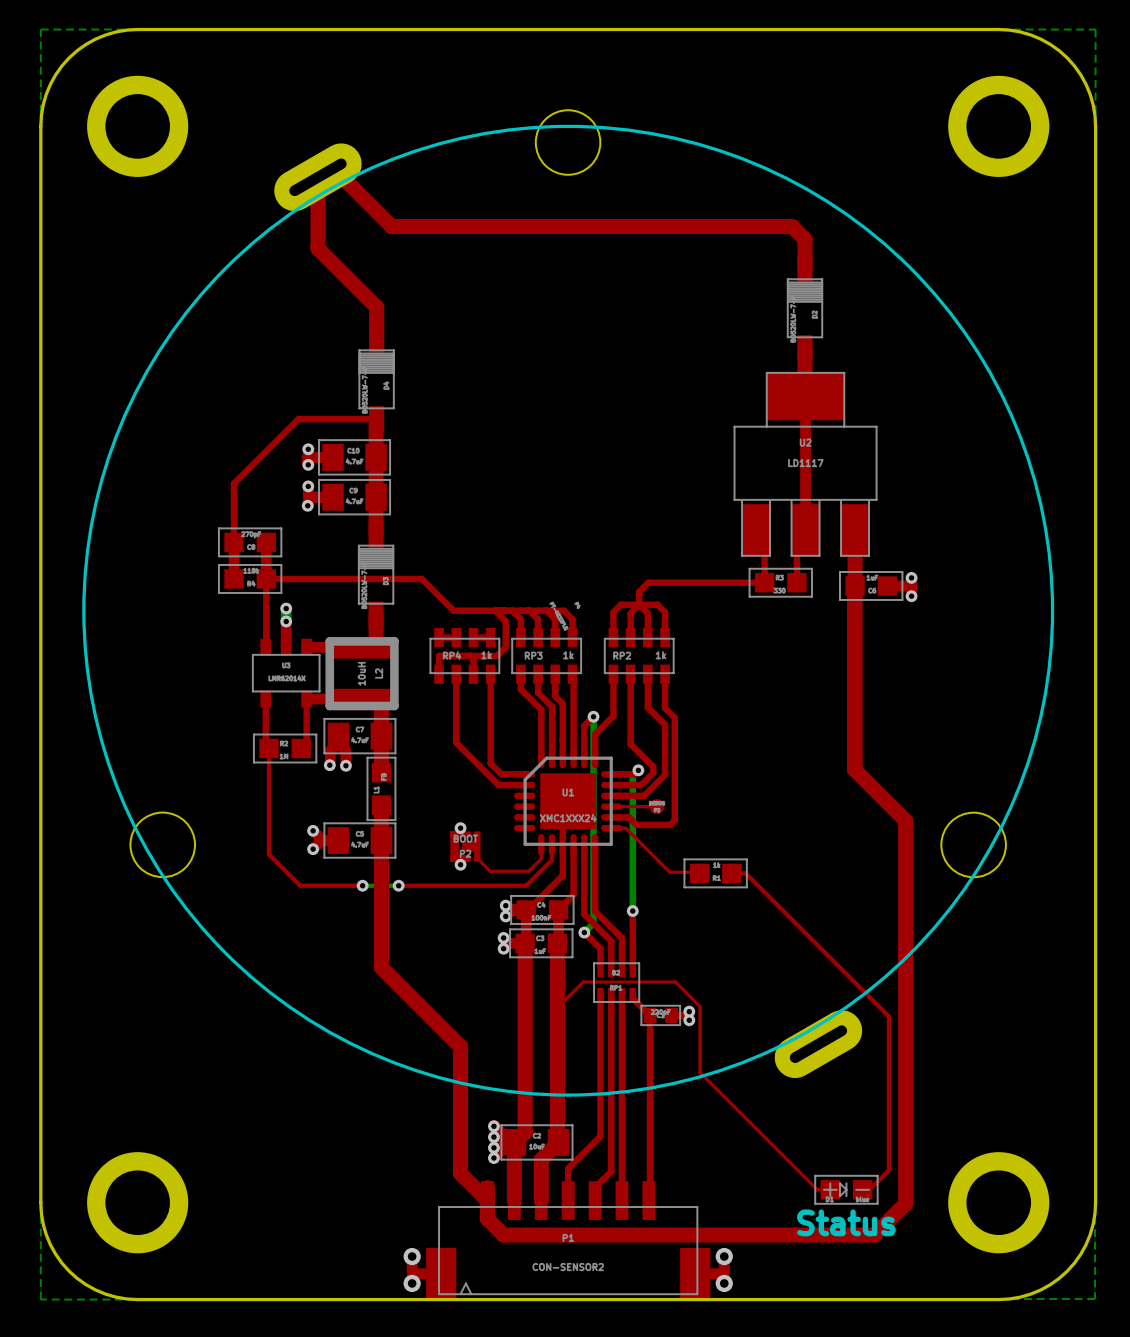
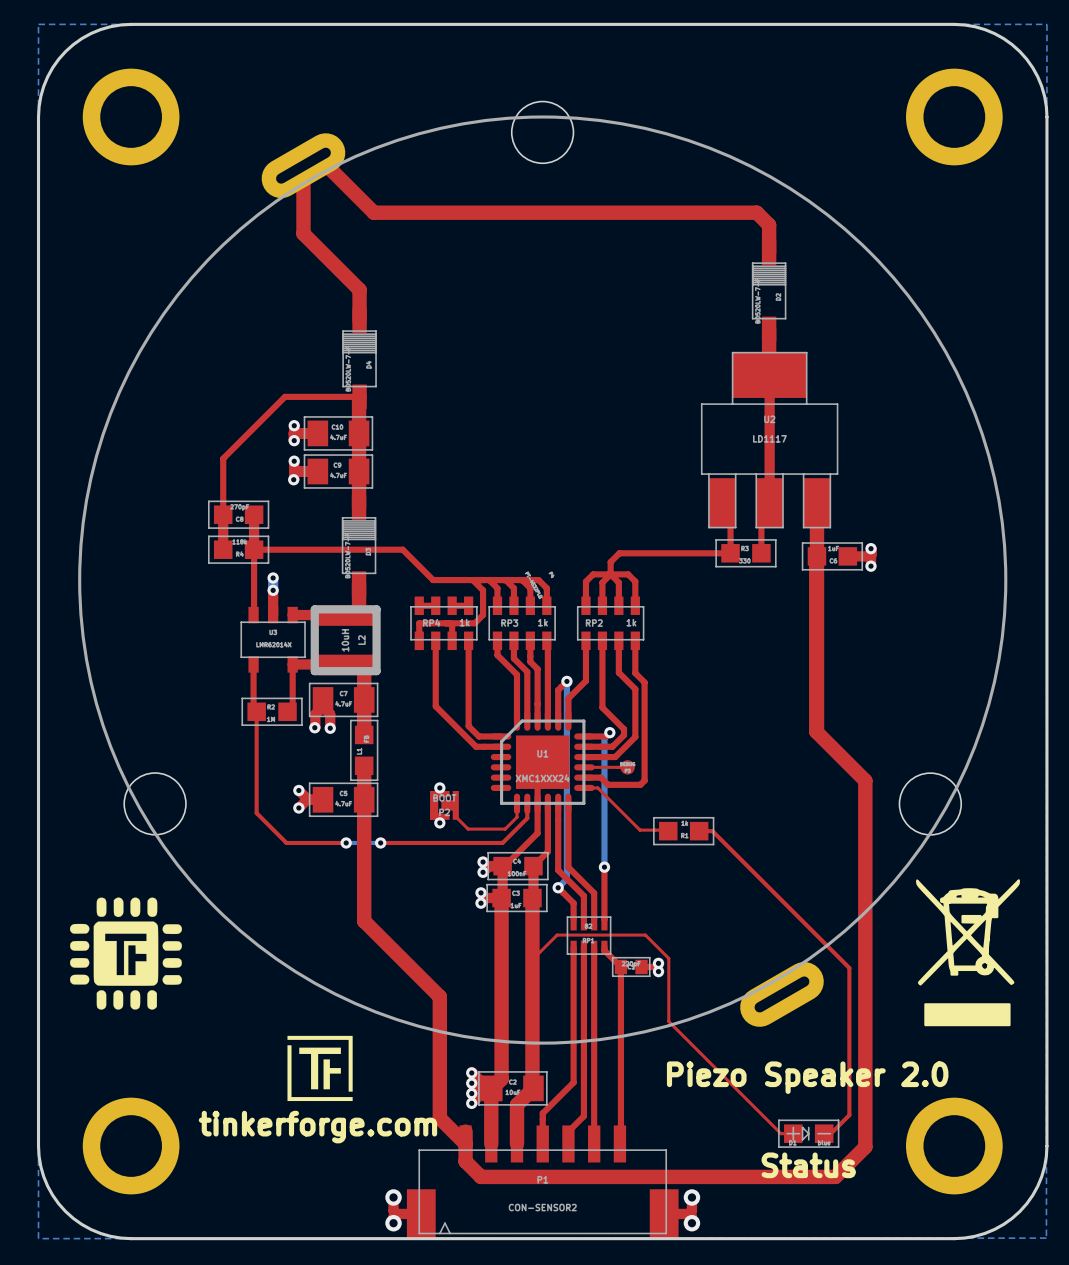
part footprint: [82, 110, 1055, 1097] -> [78, 101, 1008, 1045]
drawing: none -> [916, 879, 1020, 1027]
drawing: none -> [69, 897, 183, 1010]
drawing: none -> [287, 1035, 353, 1102]
text: none -> Piezo Speaker 2.0 (807, 1077)
text: none -> tinkerforge.com (317, 1127)

